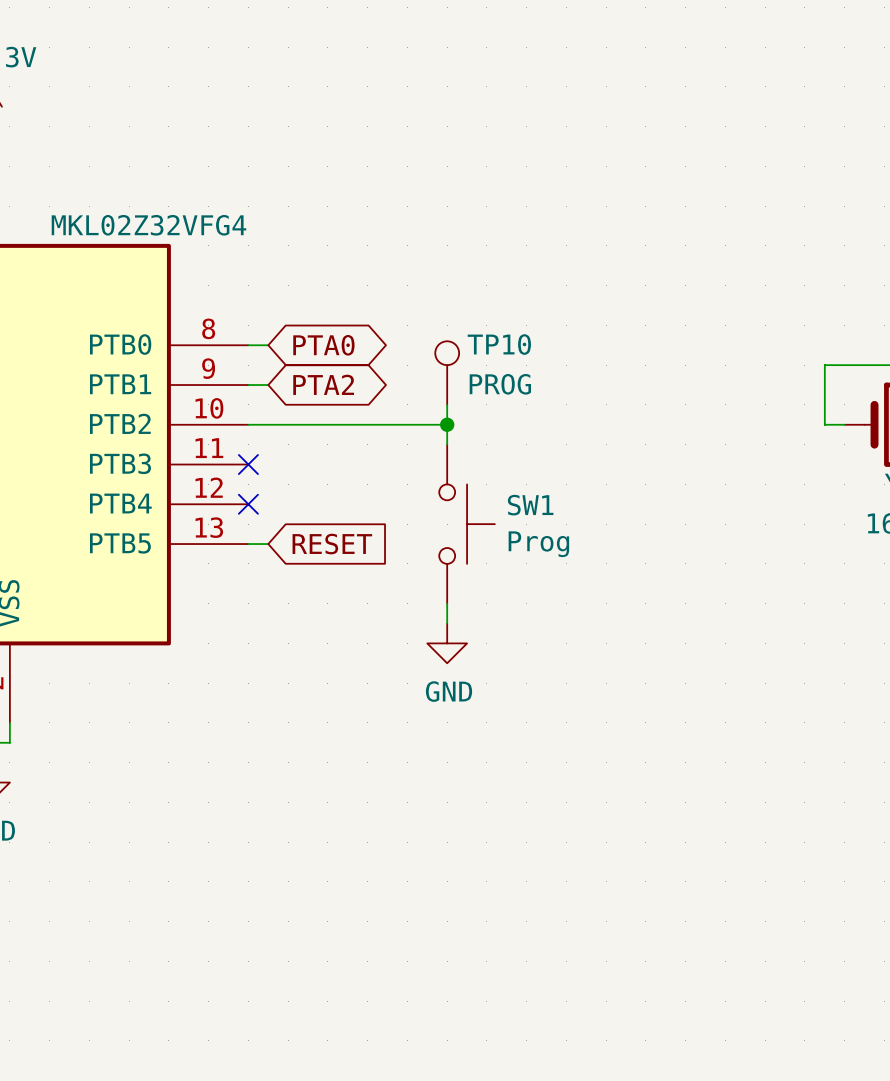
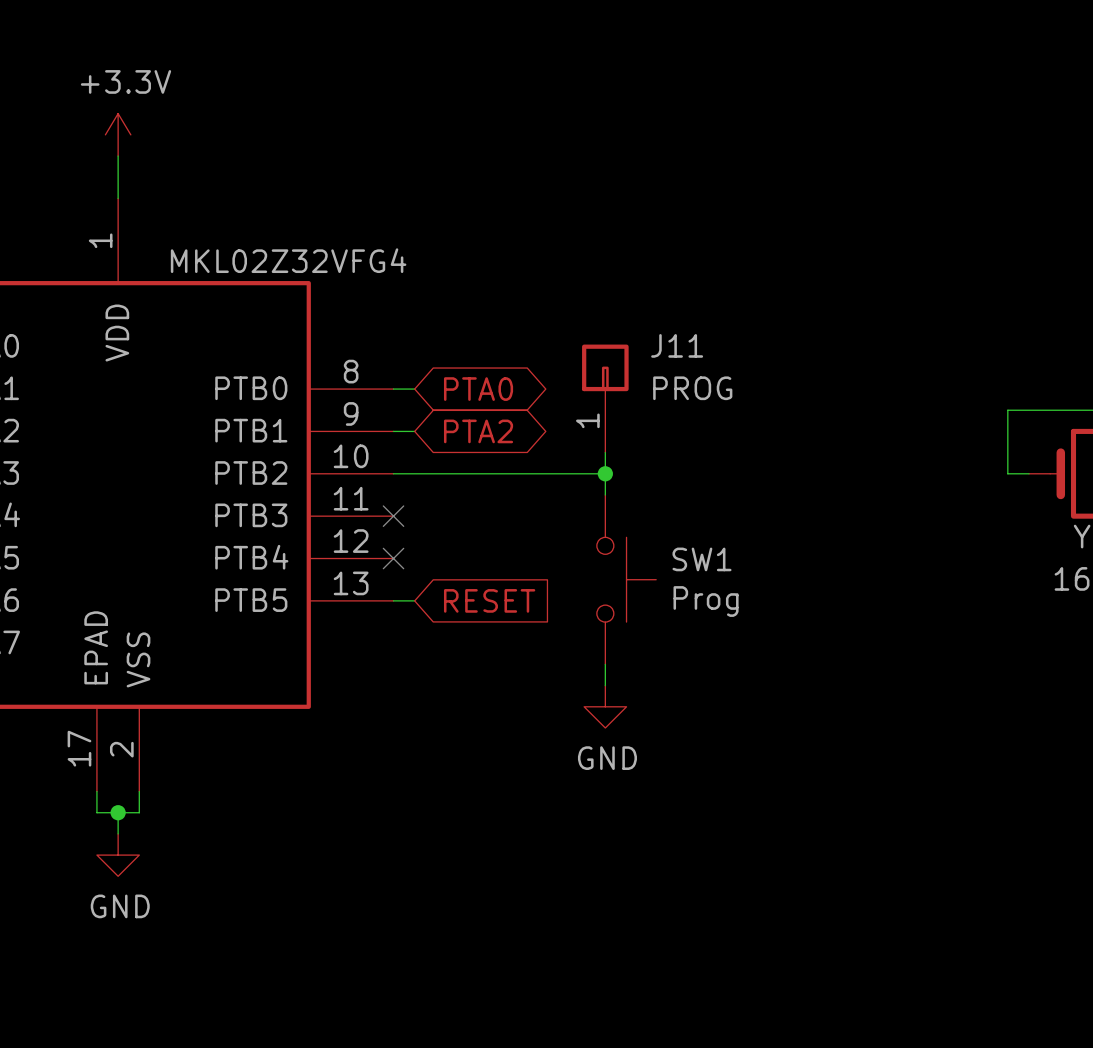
J11: none -> PROG (605, 398)
TP10: PROG (447, 373) -> none

